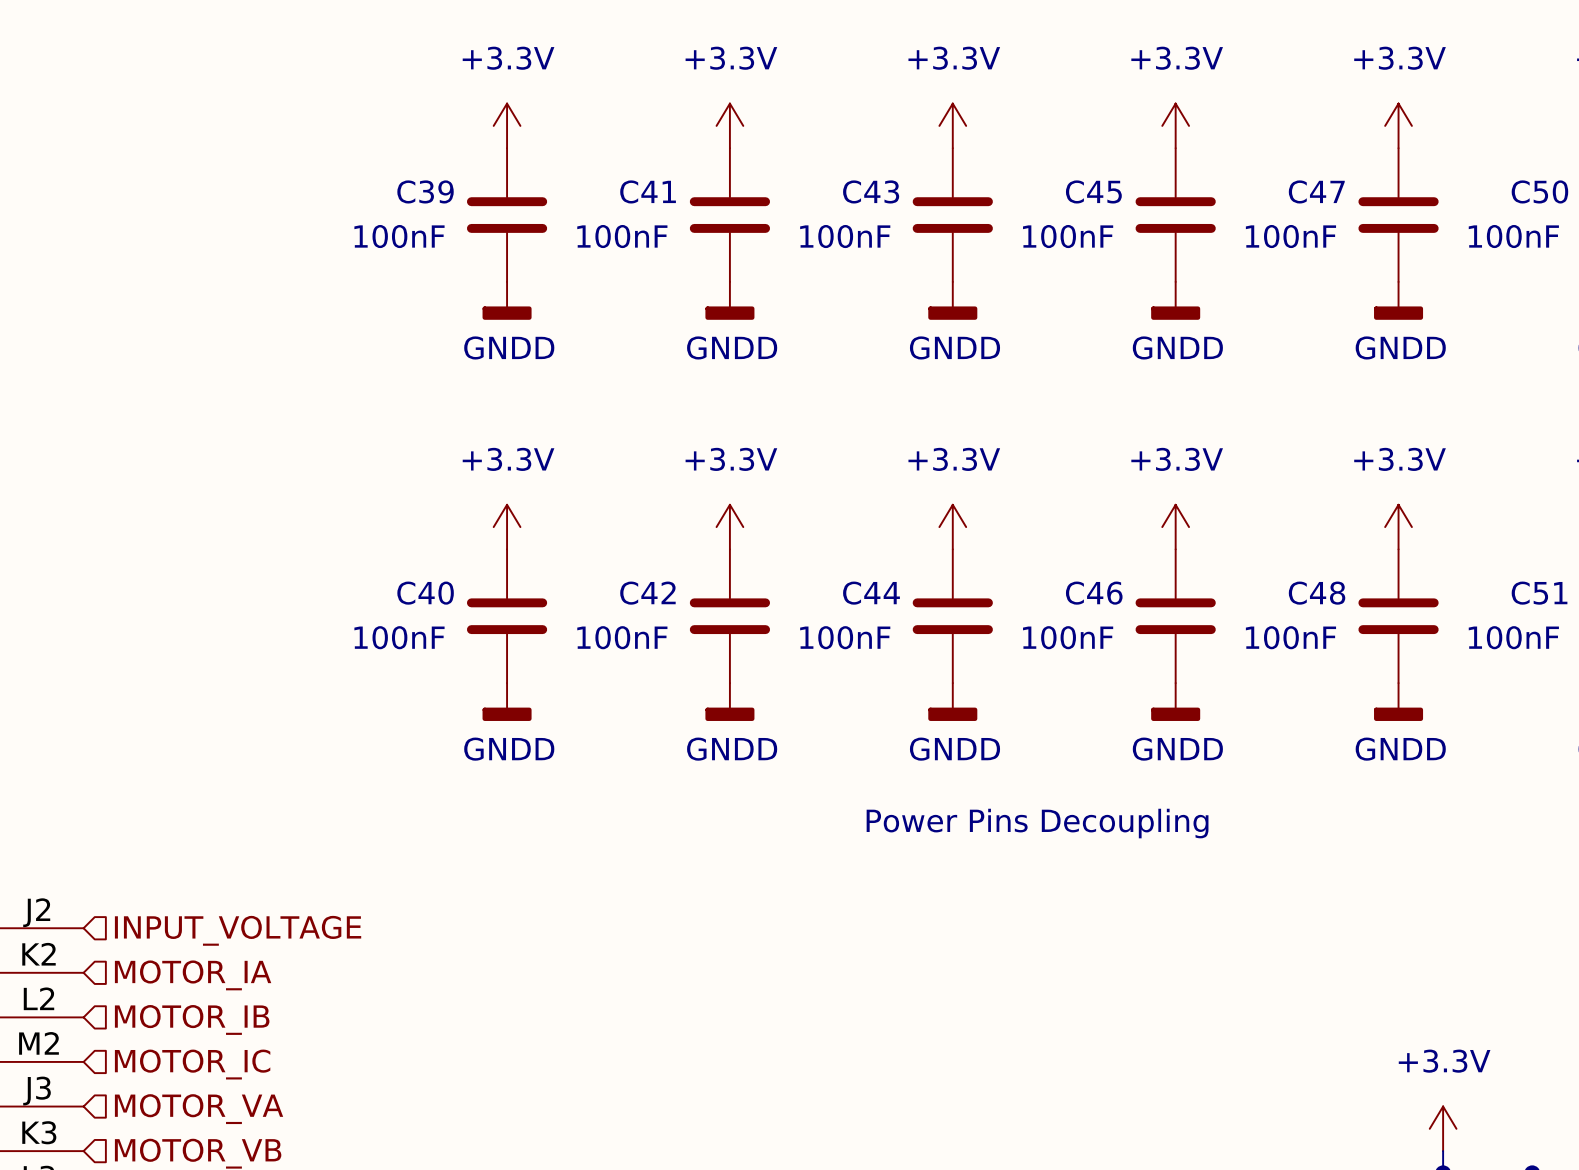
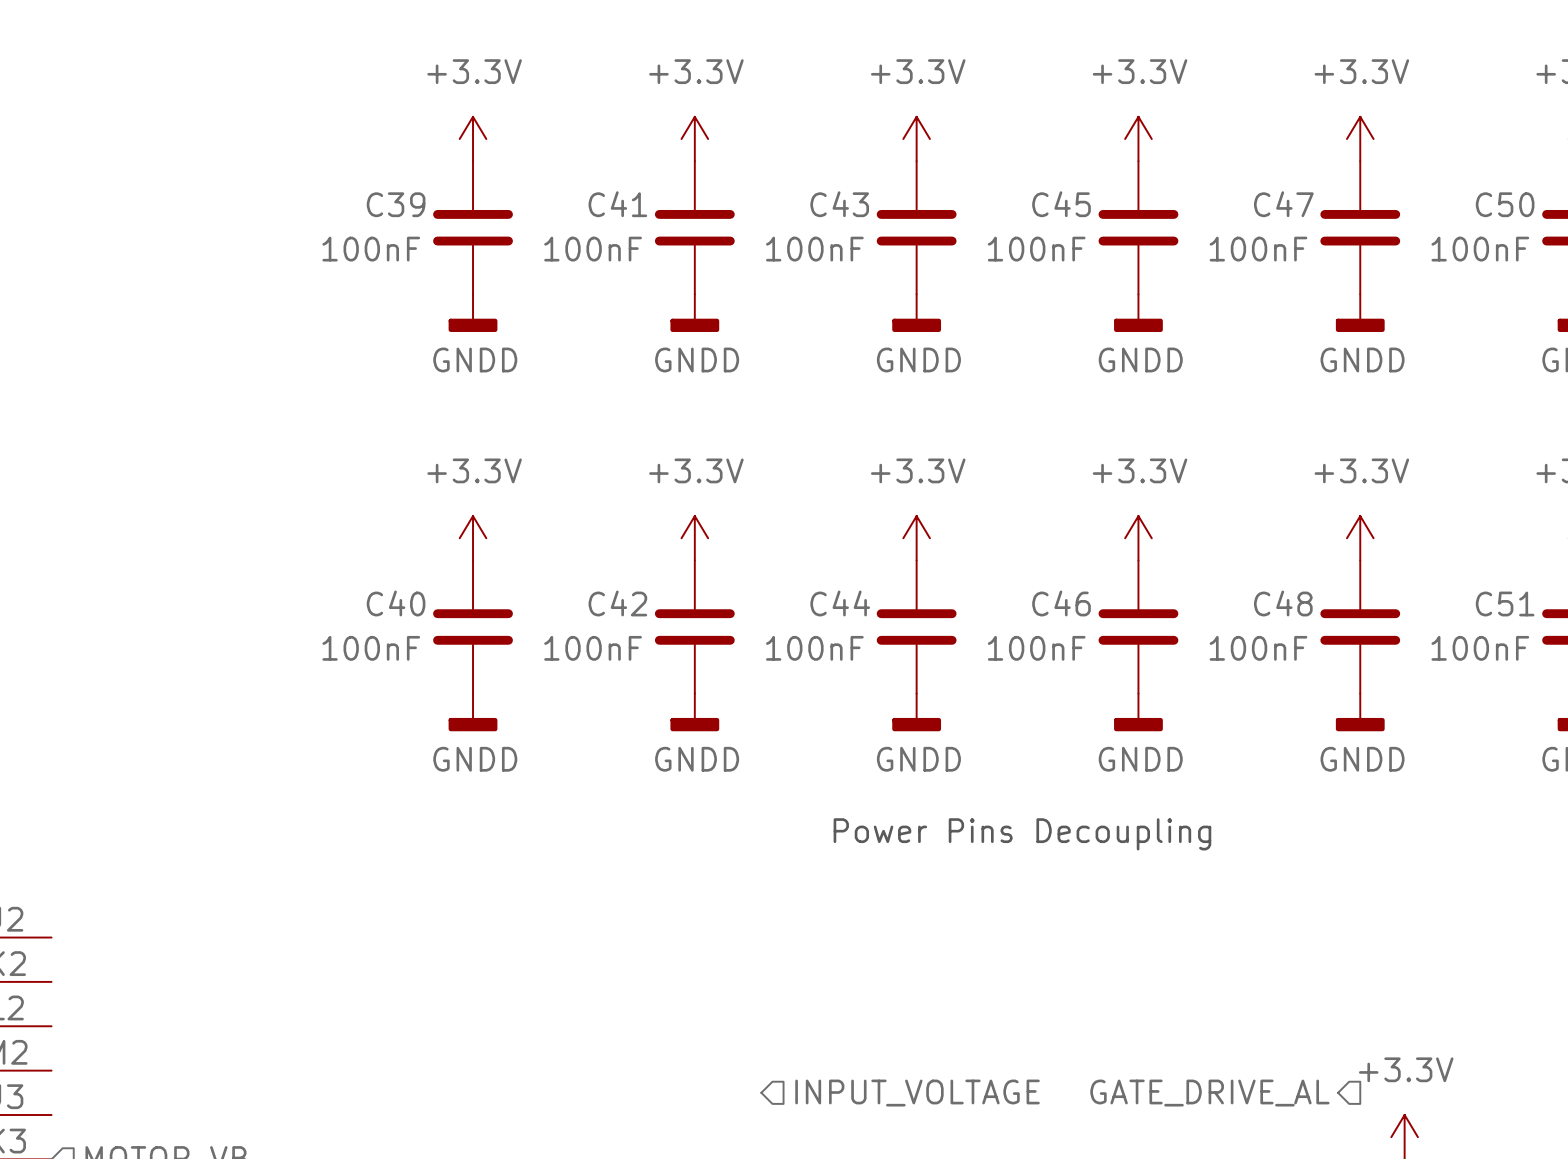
hierarchical label: INPUT_VOLTAGE (238, 930) -> none
hierarchical label: MOTOR_IA (193, 975) -> none
hierarchical label: MOTOR_IB (192, 1019) -> none
hierarchical label: MOTOR_IC (192, 1064) -> none
hierarchical label: none -> INPUT_VOLTAGE (917, 1093)
hierarchical label: none -> GATE_DRIVE_AL (1209, 1093)
hierarchical label: MOTOR_VA (199, 1109) -> none

